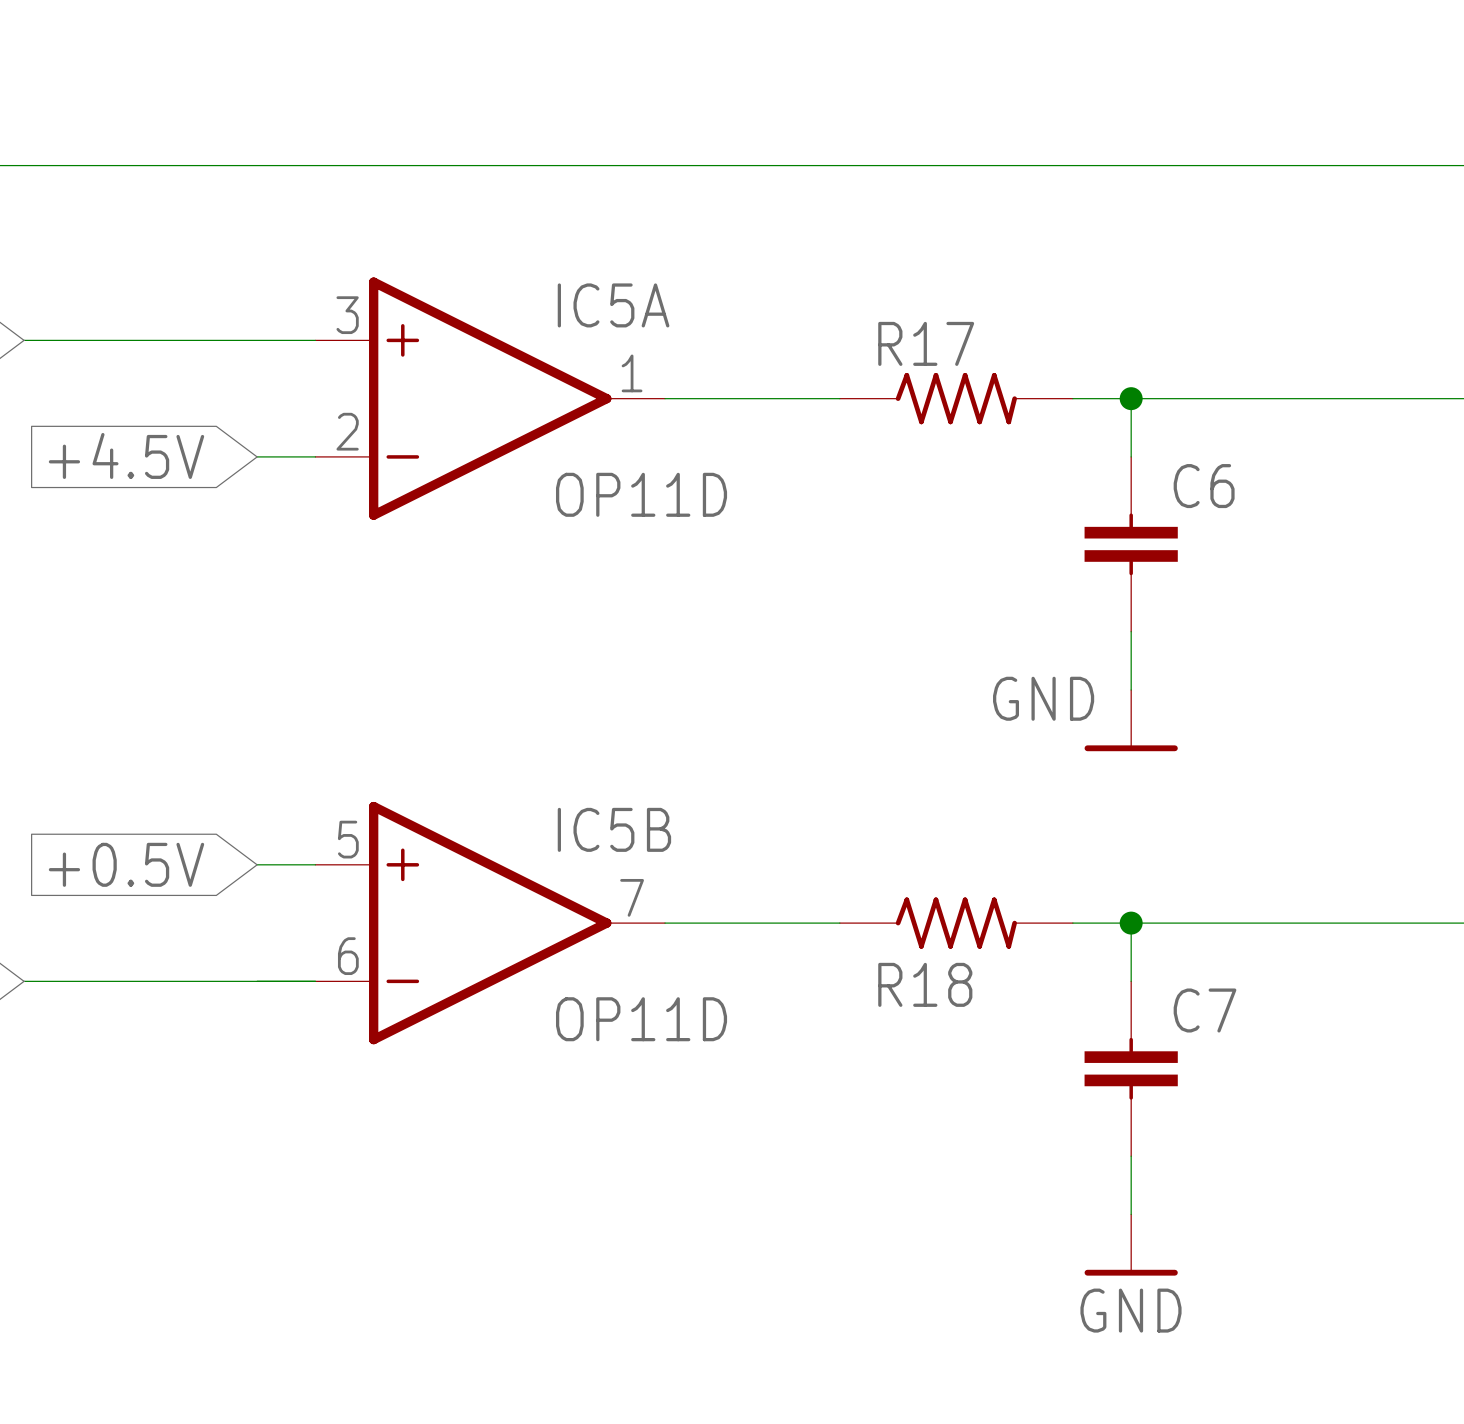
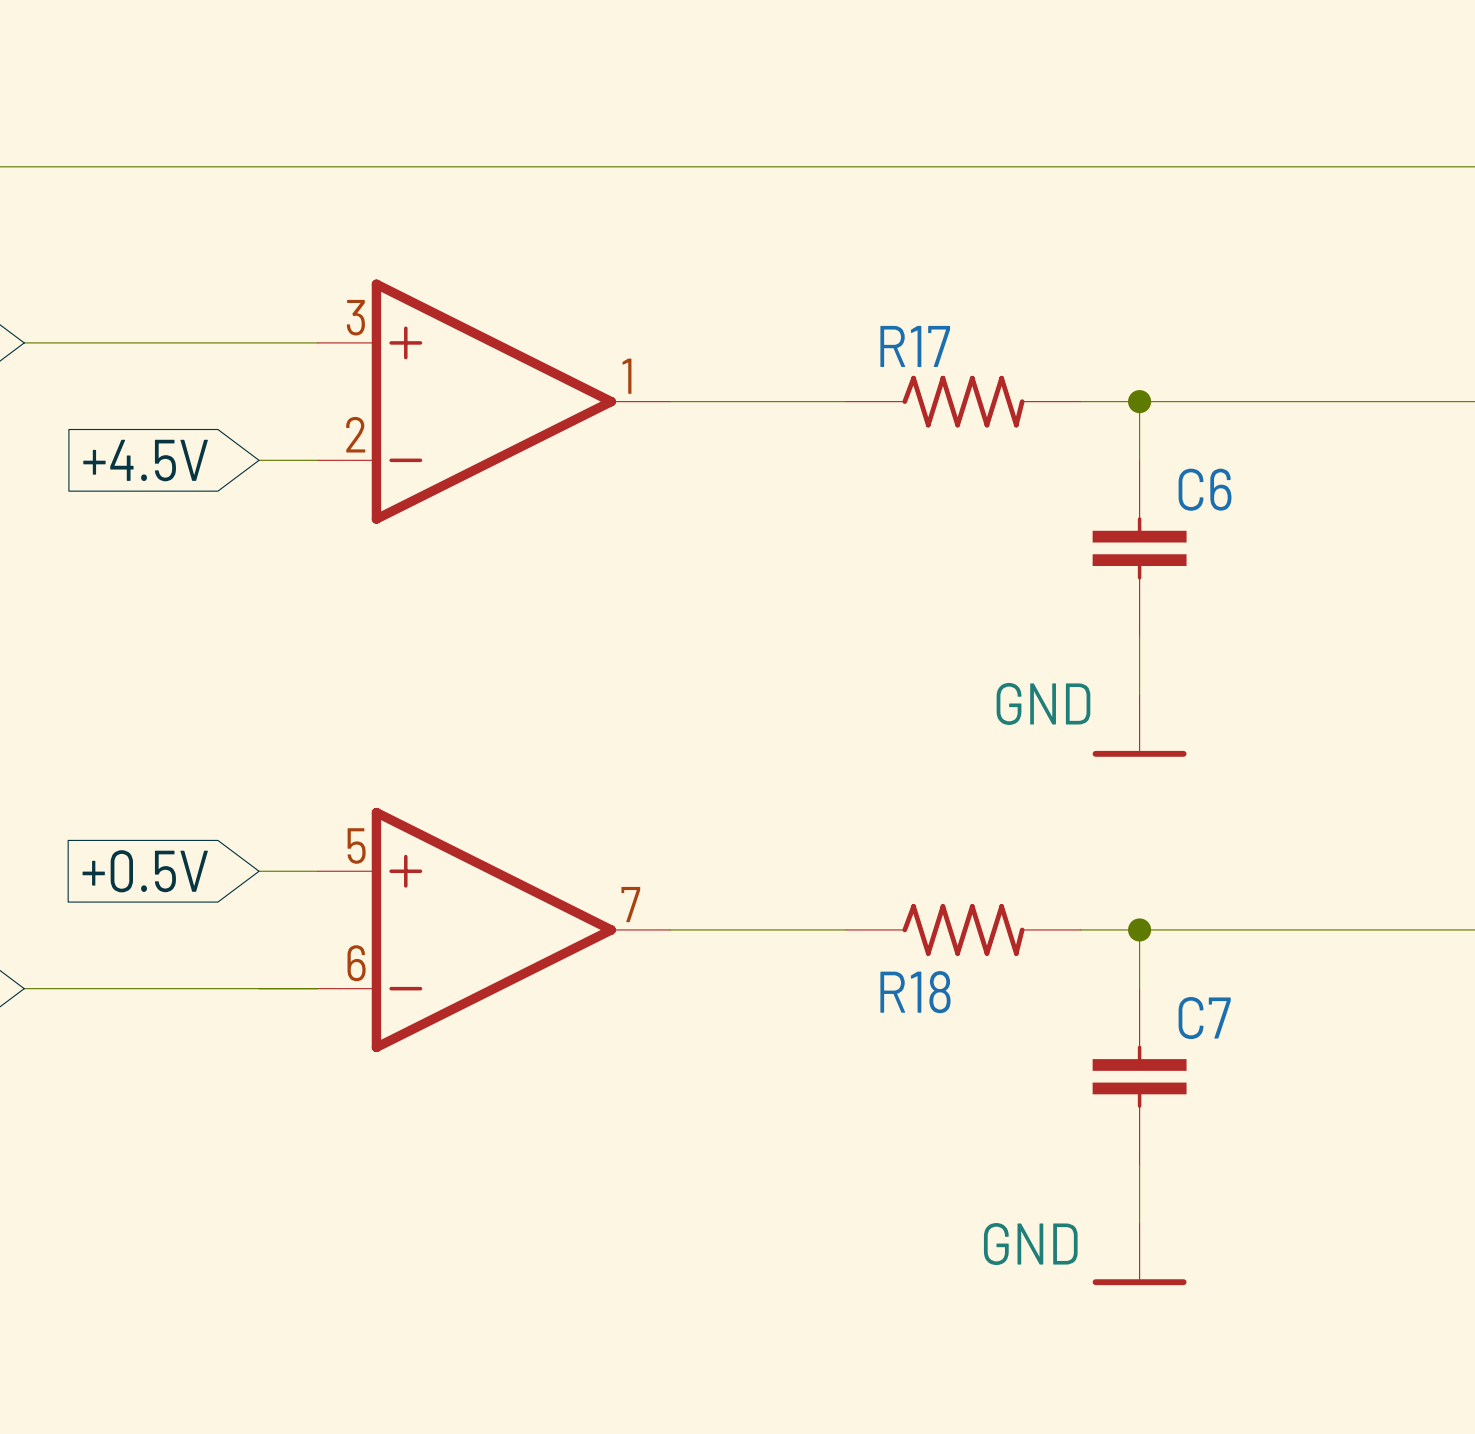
IC5A name: IC5A (613, 305) -> none
IC5A value: OP11D (641, 494) -> none
IC5B name: IC5B (614, 829) -> none
IC5B value: OP11D (641, 1019) -> none
power symbol text position: GND (1130, 1310) -> GND (1030, 1244)

